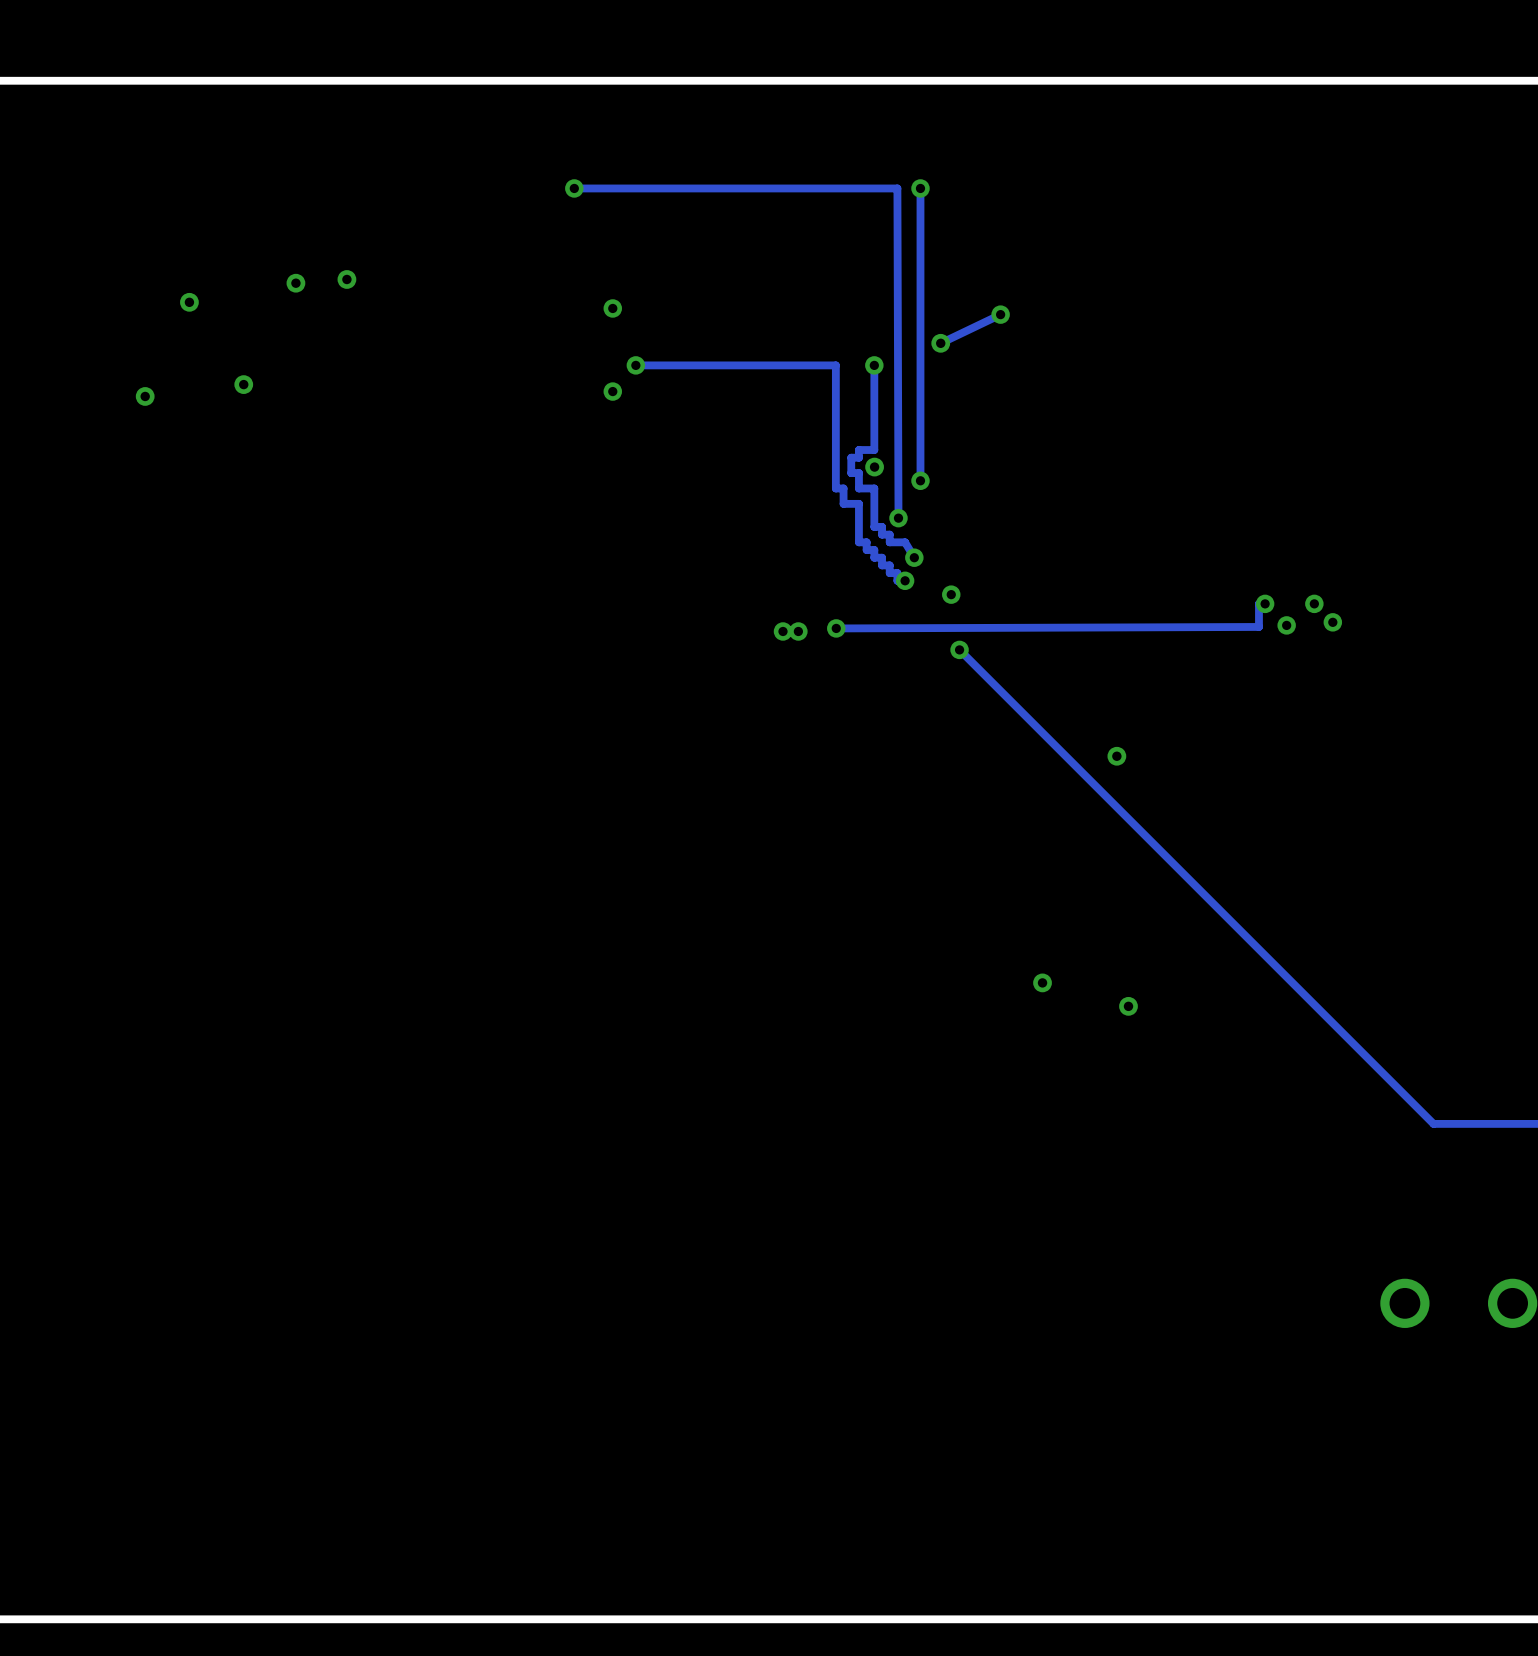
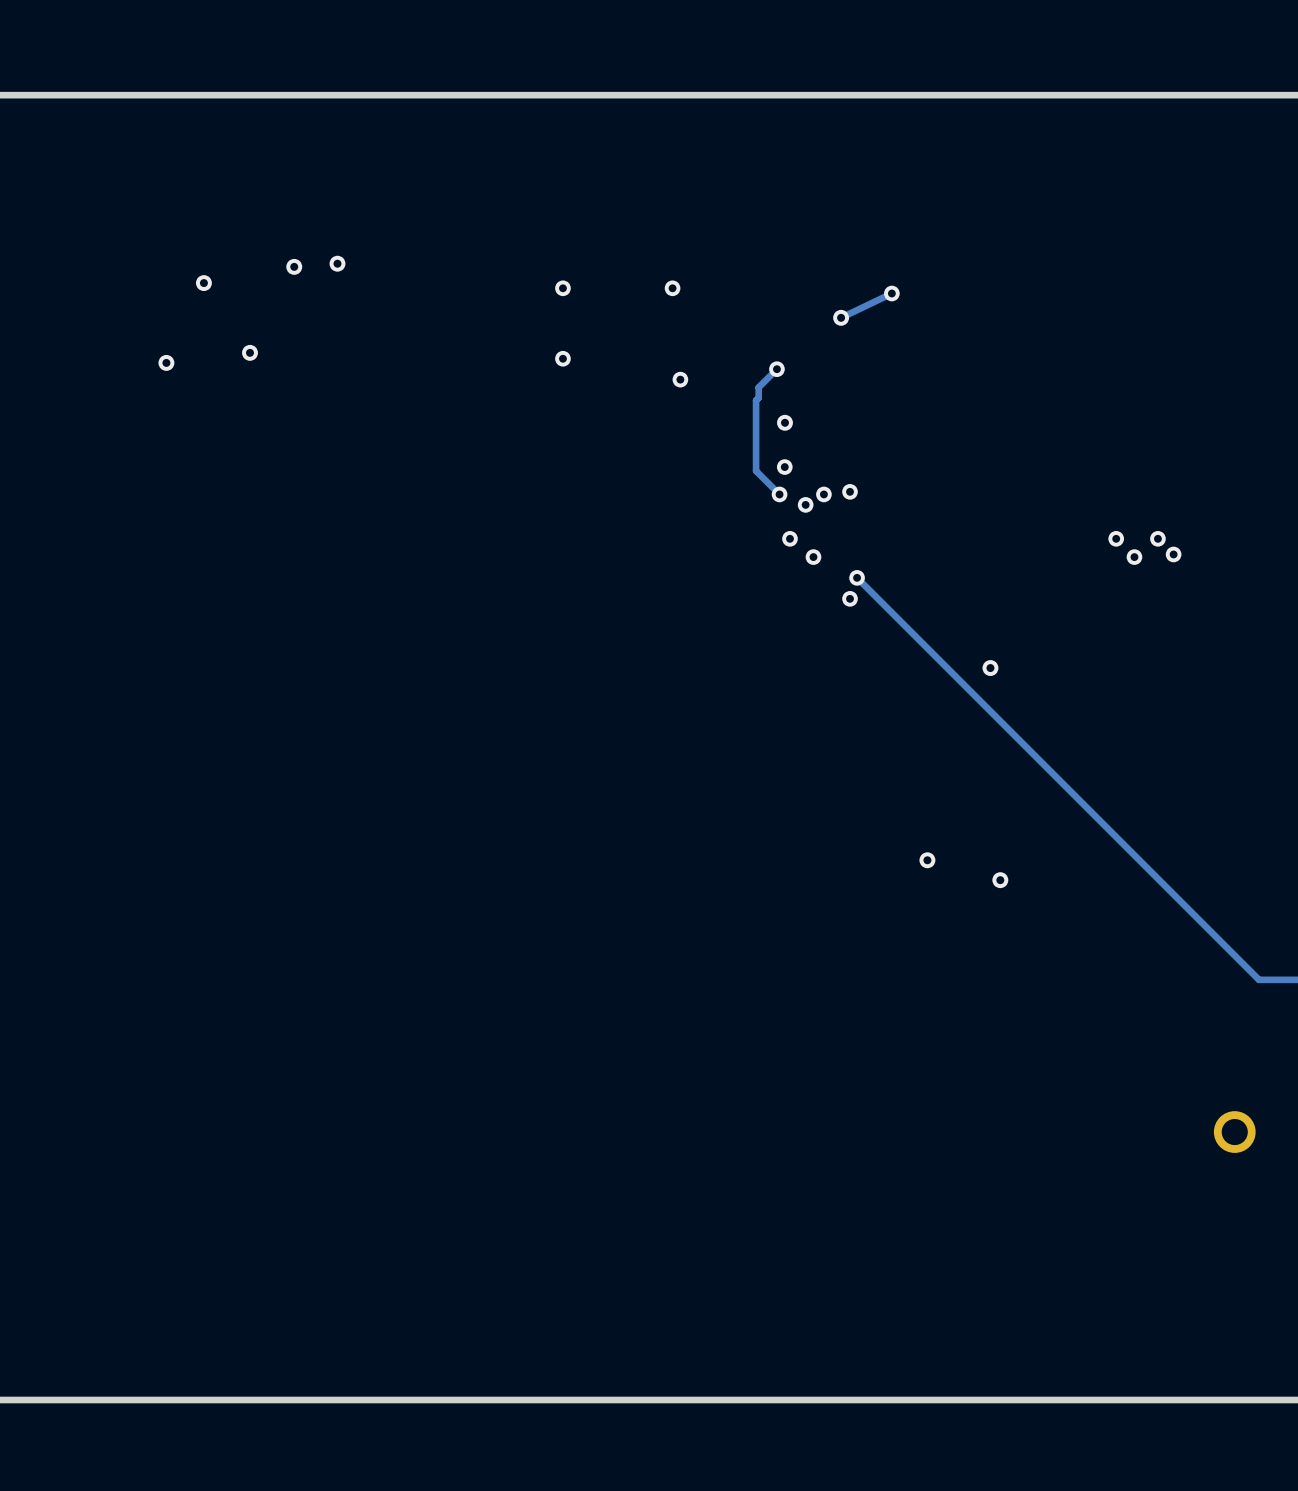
track: (574, 188) (897, 188) (898, 518) -> none
via: (574, 188) -> none
track: (920, 188) (920, 480) -> none
via: (920, 188) -> none
via: none -> (672, 288)
track: (635, 365) (835, 365) (835, 488) (843, 488) (843, 503) (858, 503) (858, 542) (866, 542) (866, 550) (874, 550) (874, 557) (882, 557) (882, 565) (889, 565) (889, 573) (897, 573) (897, 580) (905, 580) -> none
via: (635, 365) -> none
track: (874, 365) (874, 450) (858, 450) (858, 457) (851, 457) (851, 473) (858, 473) (858, 488) (874, 488) (874, 526) (882, 526) (882, 534) (889, 534) (889, 542) (905, 542) (914, 557) -> none
via position: (874, 365) -> (776, 369)
track: none -> (776, 369) (758, 387) (758, 397) (756, 400) (756, 470) (779, 494)
via: none -> (680, 379)
via: (920, 480) -> none
via: (898, 518) -> none
via: none -> (784, 467)
via: none -> (850, 491)
via: none -> (779, 494)
via: none -> (823, 494)
via: (914, 557) -> none
via: none -> (805, 504)
via: (905, 580) -> none
via: (951, 594) -> none
via: none -> (789, 538)
track: (1266, 603) (1258, 603) (1258, 626) (836, 628) -> none
via: none -> (813, 557)
via: (836, 628) -> none
via: (783, 631) -> none
via: (798, 631) -> none
via: none -> (850, 598)

